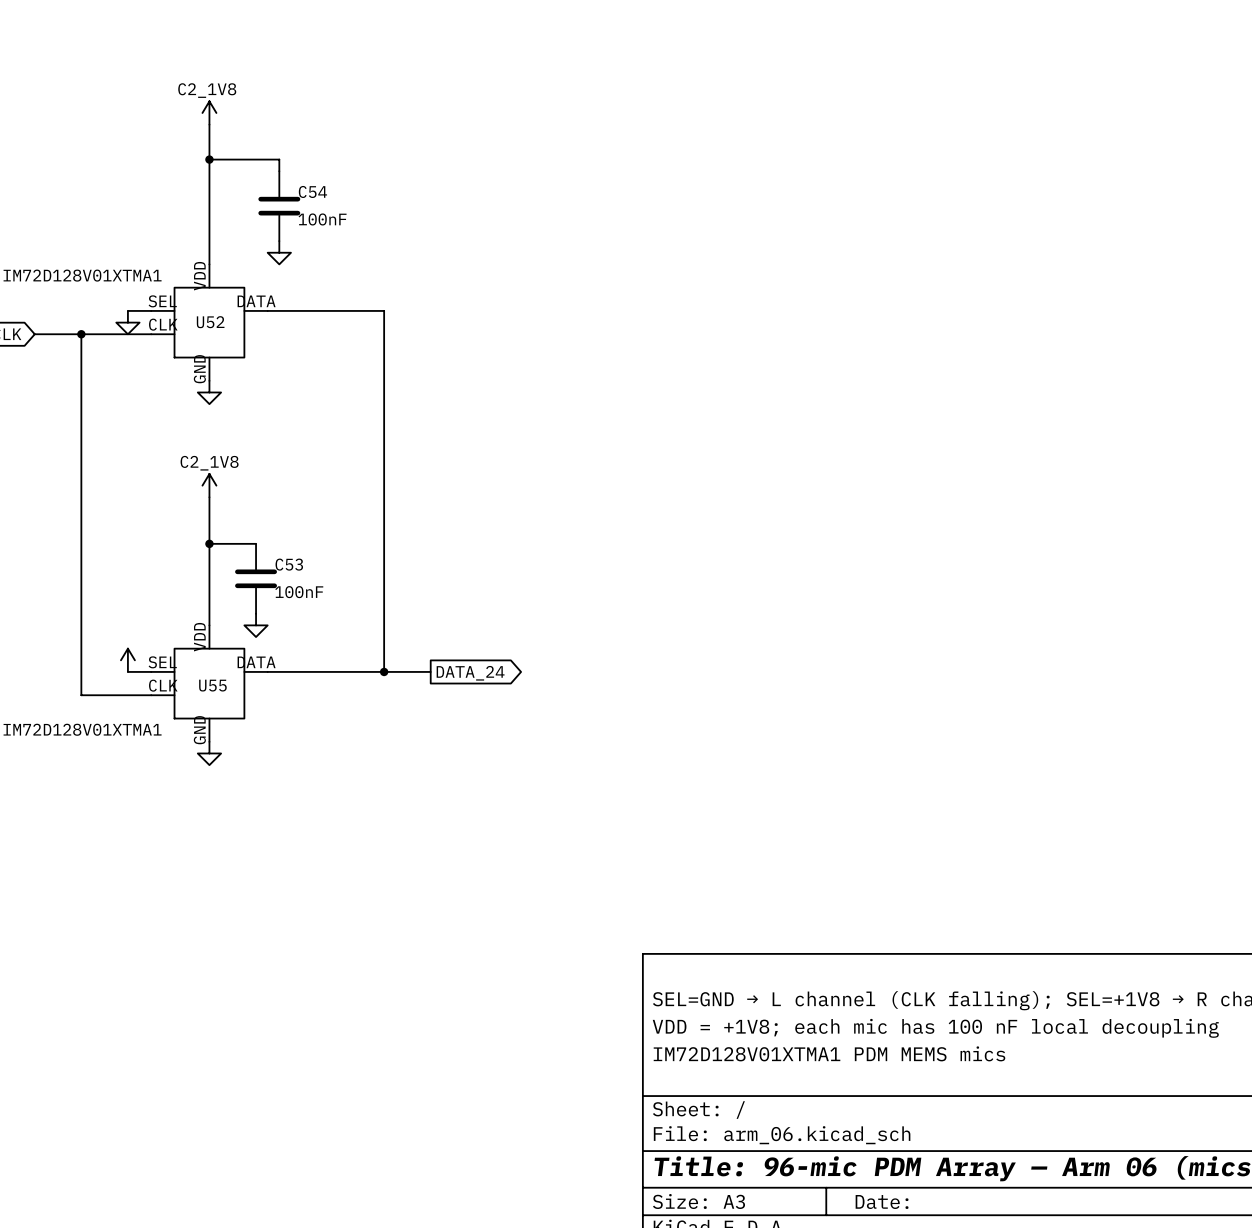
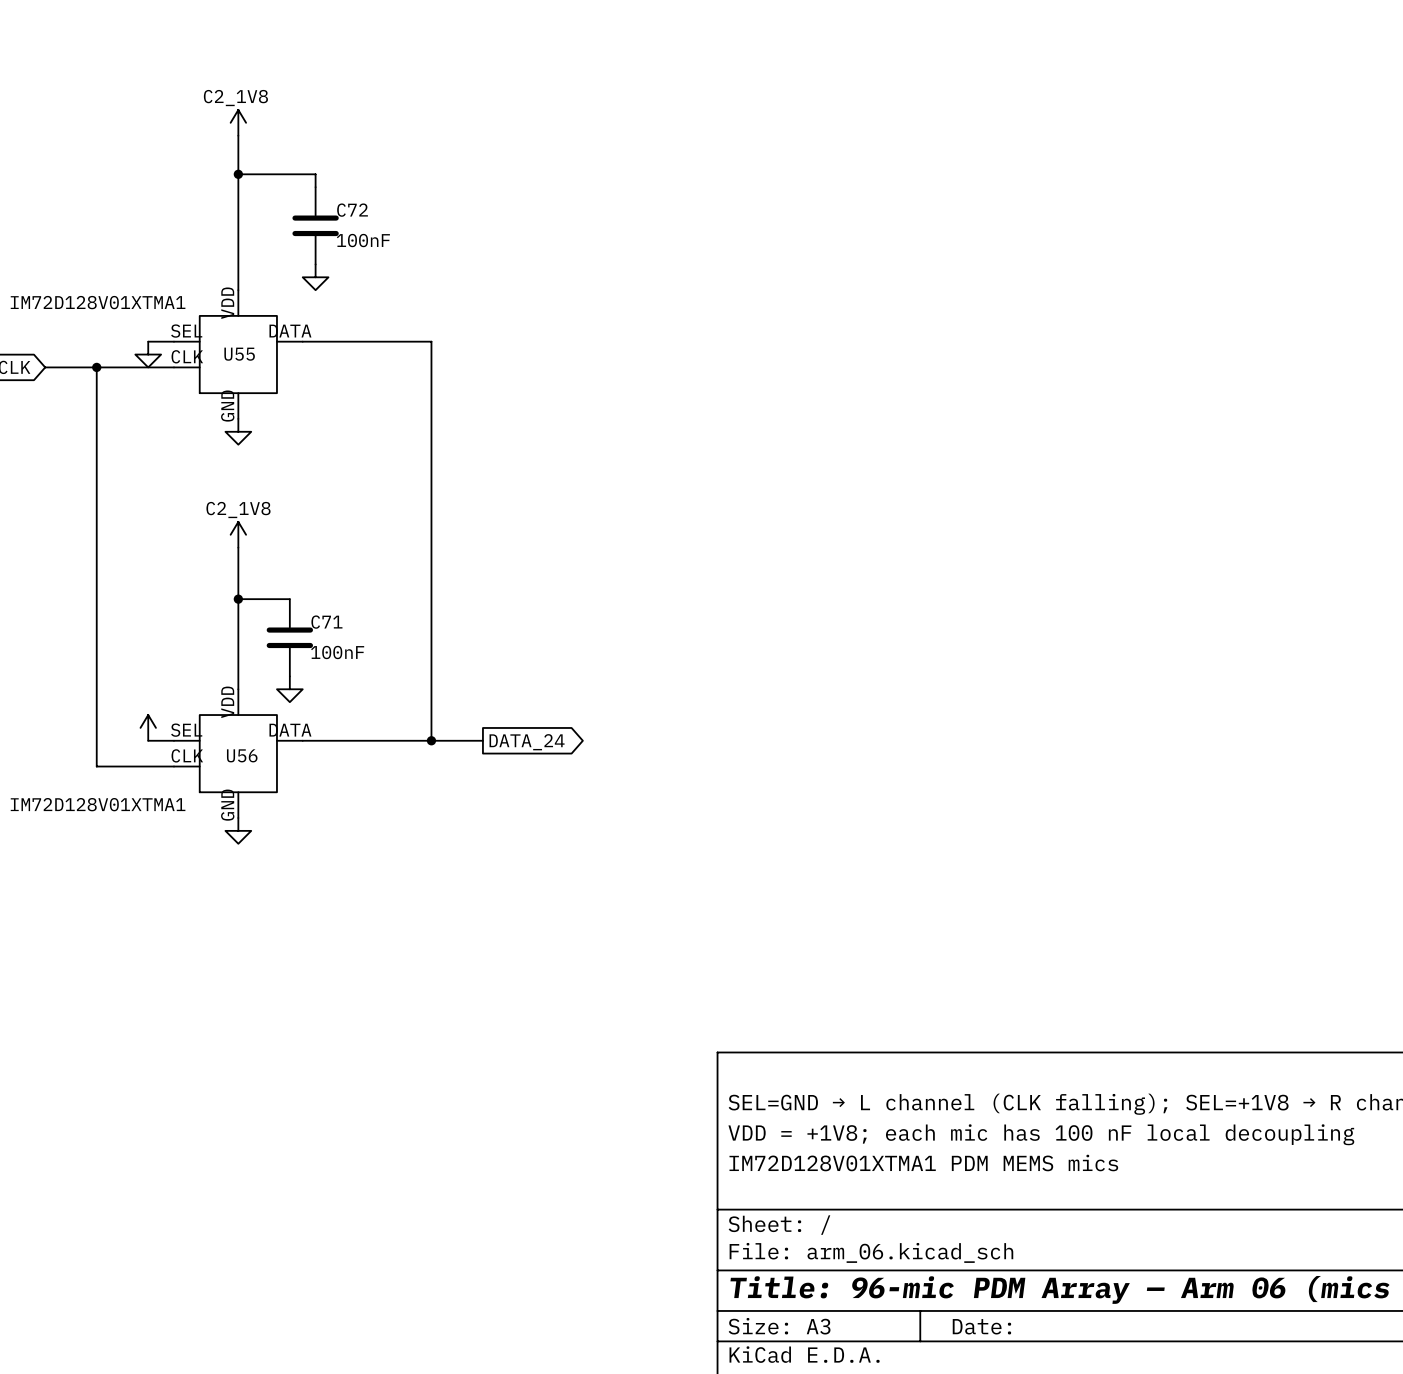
C54 name: C54 (312, 191) -> C72 (352, 210)
U52 name: U52 (210, 322) -> U55 (239, 354)
C53 name: C53 (289, 564) -> C71 (326, 622)
U55 name: U55 (212, 685) -> U56 (242, 755)

